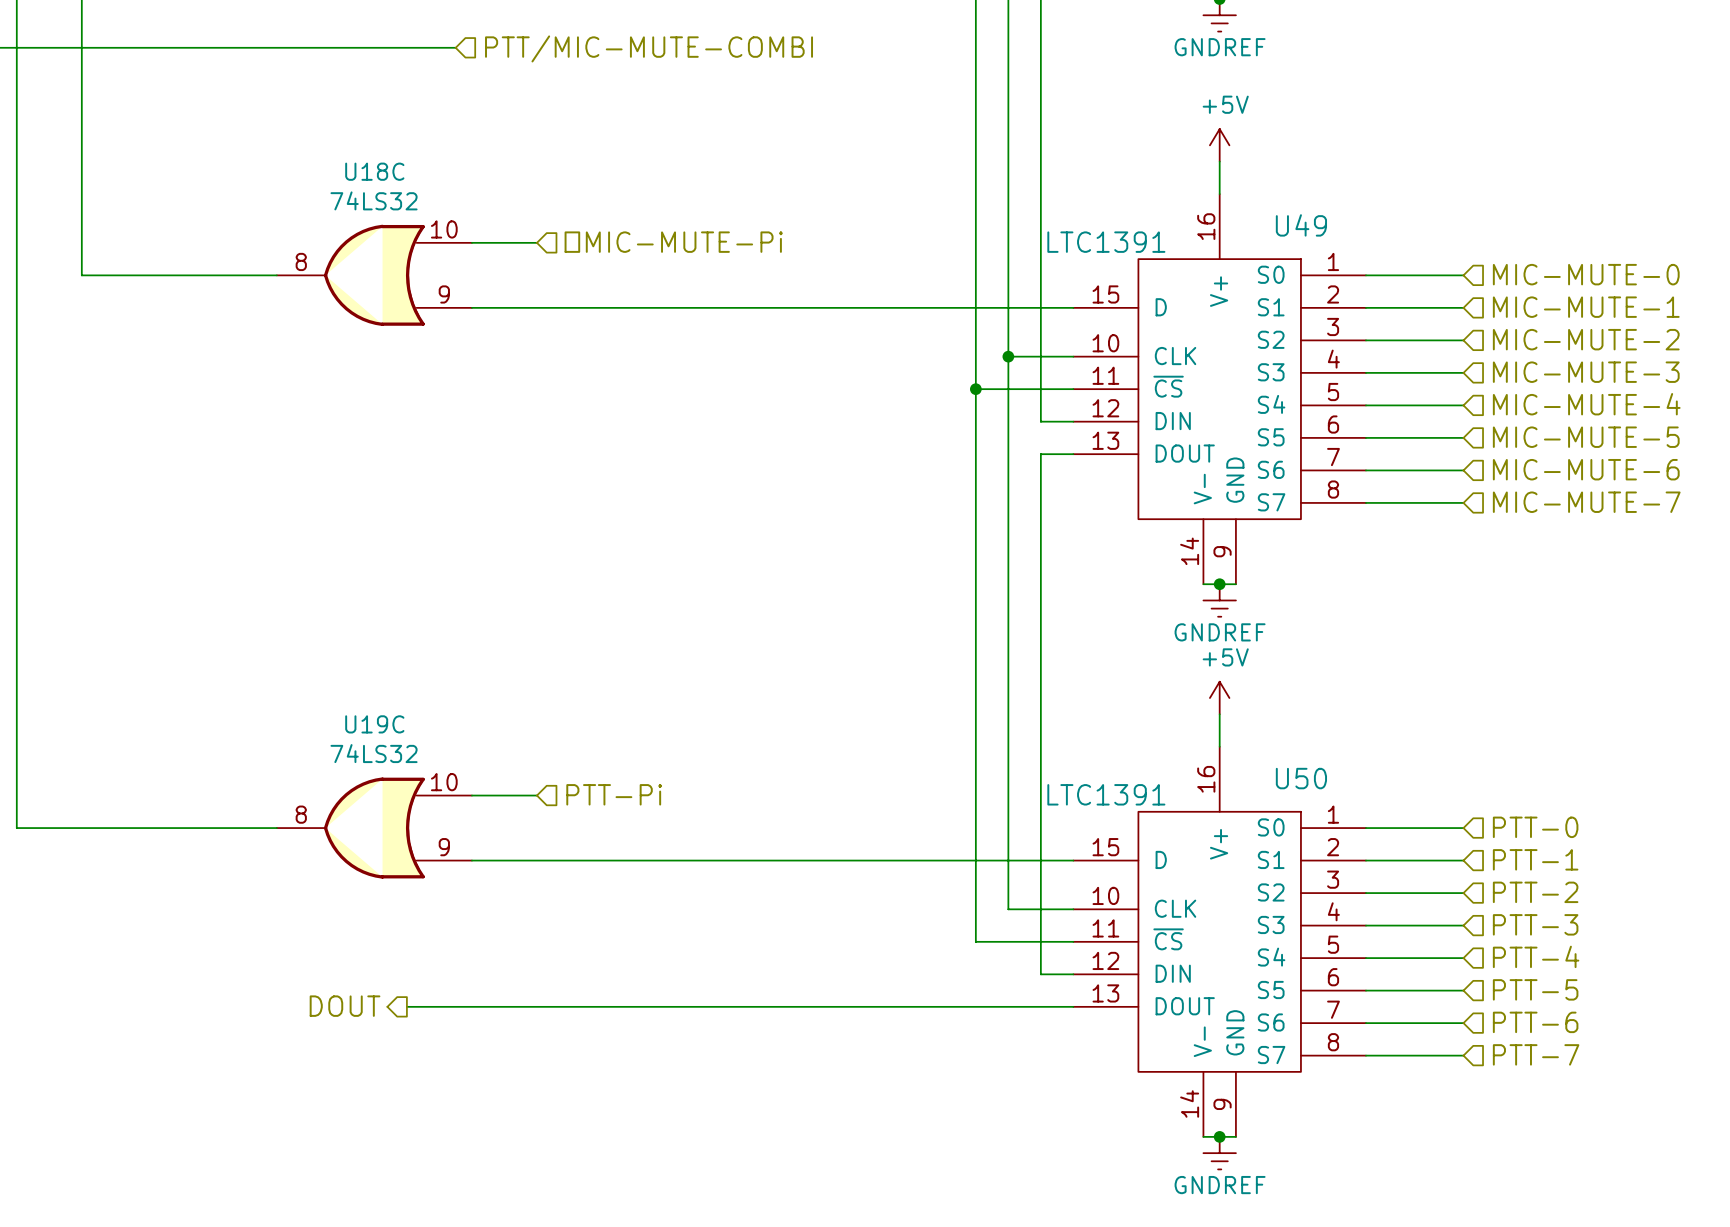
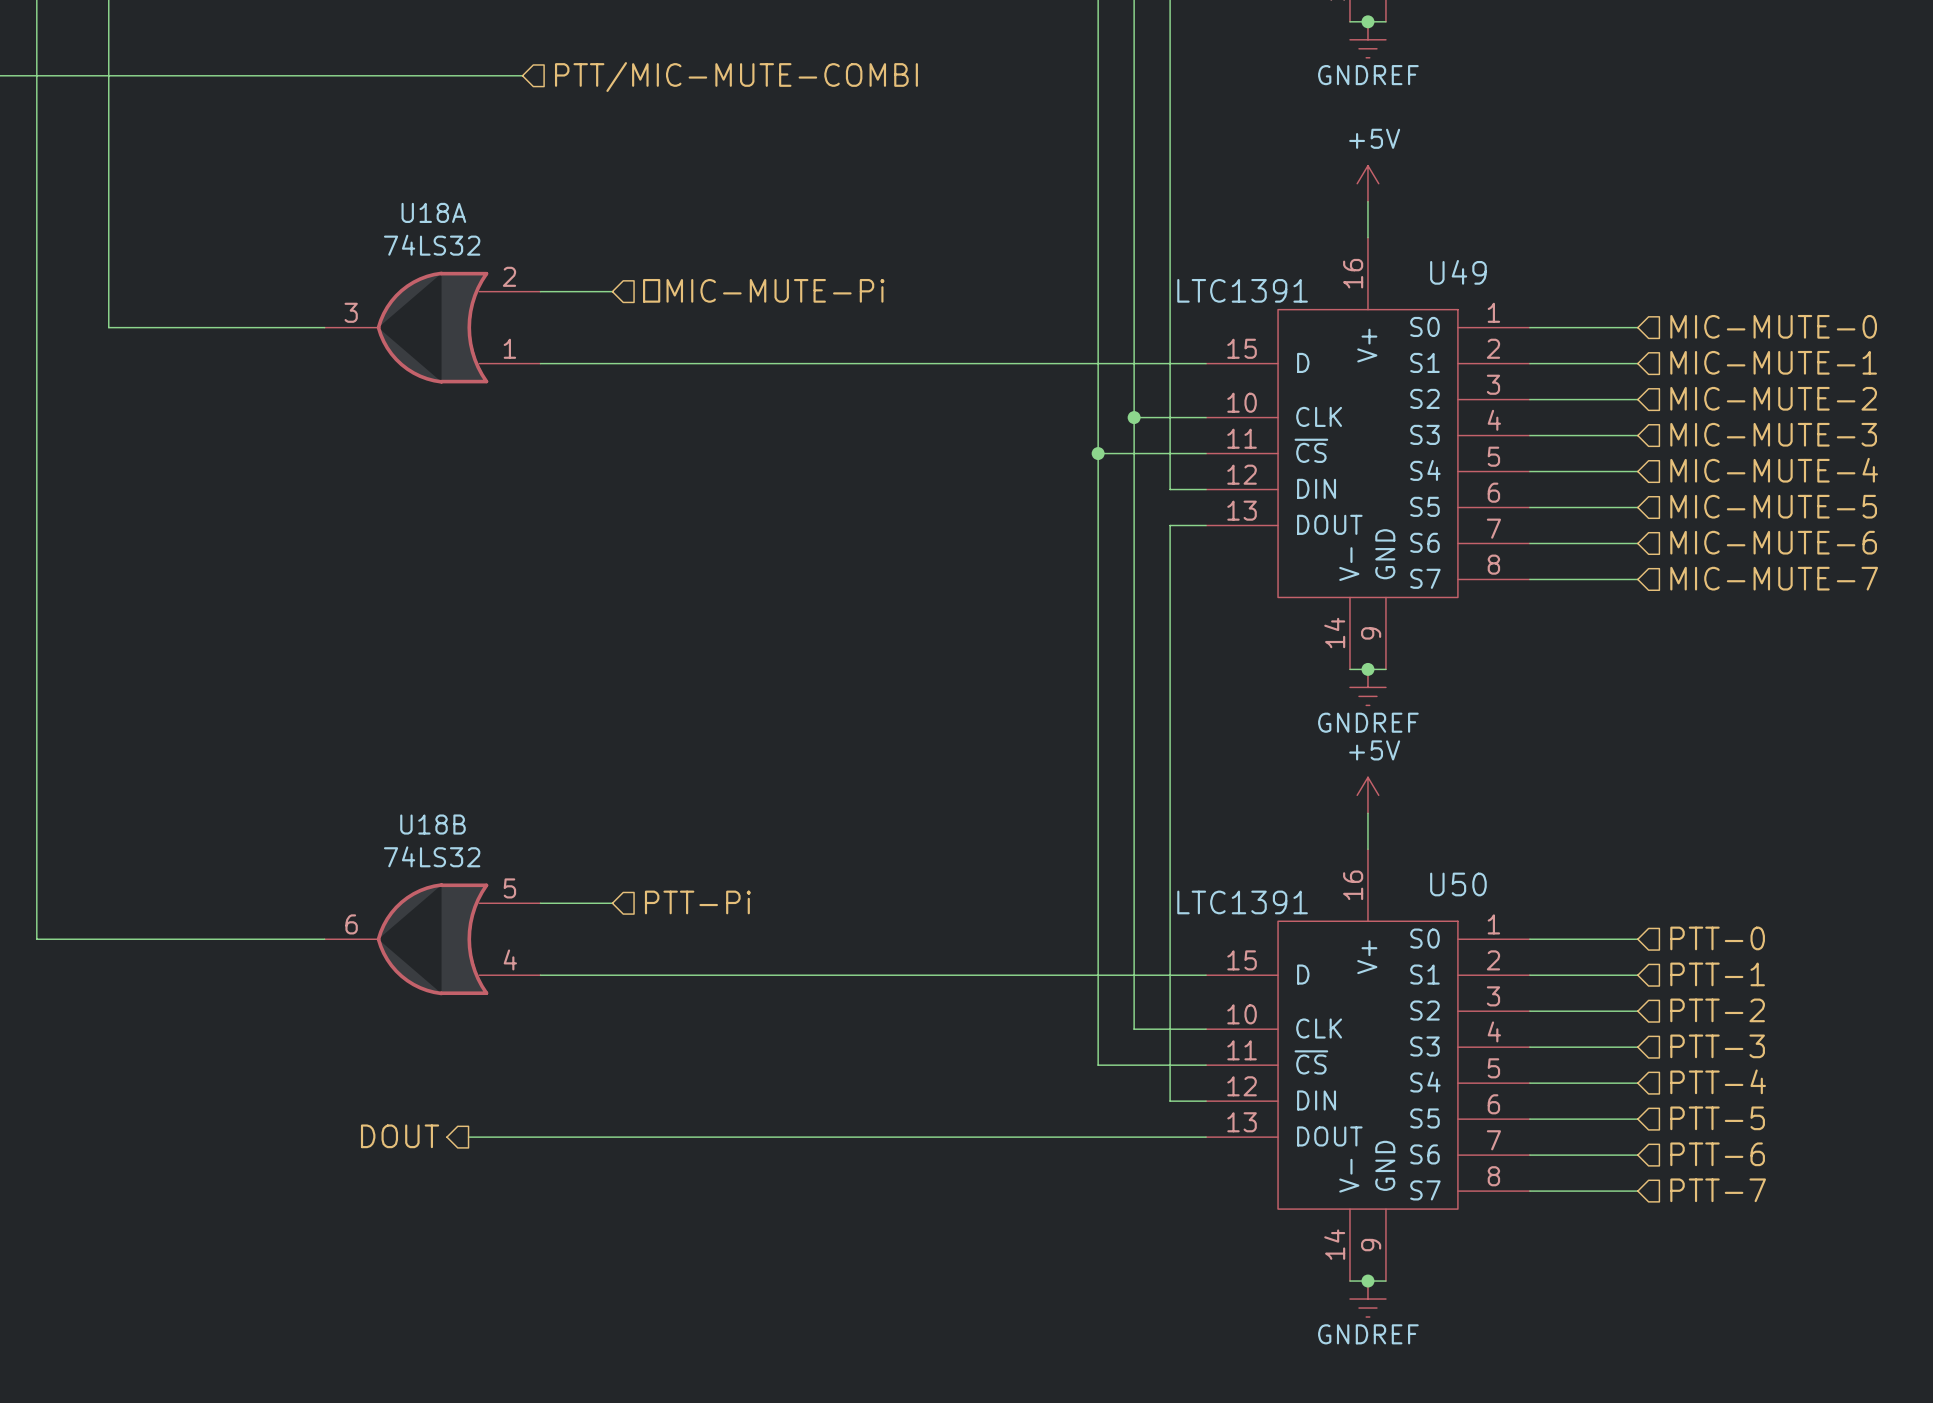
U18C name: U18C (374, 171) -> U18A (433, 212)
U18C pin number: 10 (444, 229) -> 2 (509, 276)
U18C pin number: 8 (301, 261) -> 3 (351, 312)
U18C pin number: 9 (444, 294) -> 1 (509, 348)
U19C name: U19C (374, 724) -> U18B (432, 824)
U19C pin number: 10 (444, 782) -> 5 (509, 888)
U19C pin number: 8 (301, 814) -> 6 (351, 924)
U19C pin number: 9 (444, 847) -> 4 (510, 959)

